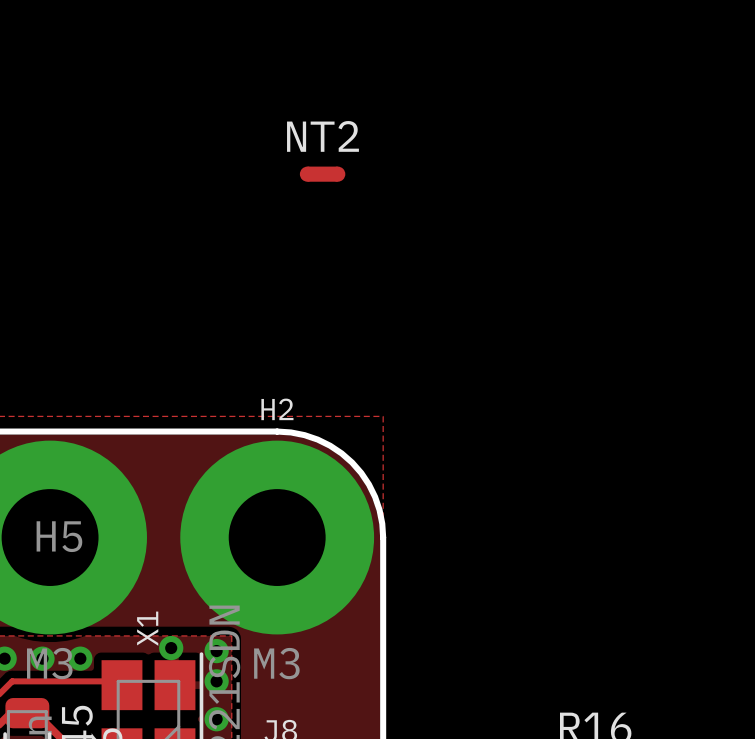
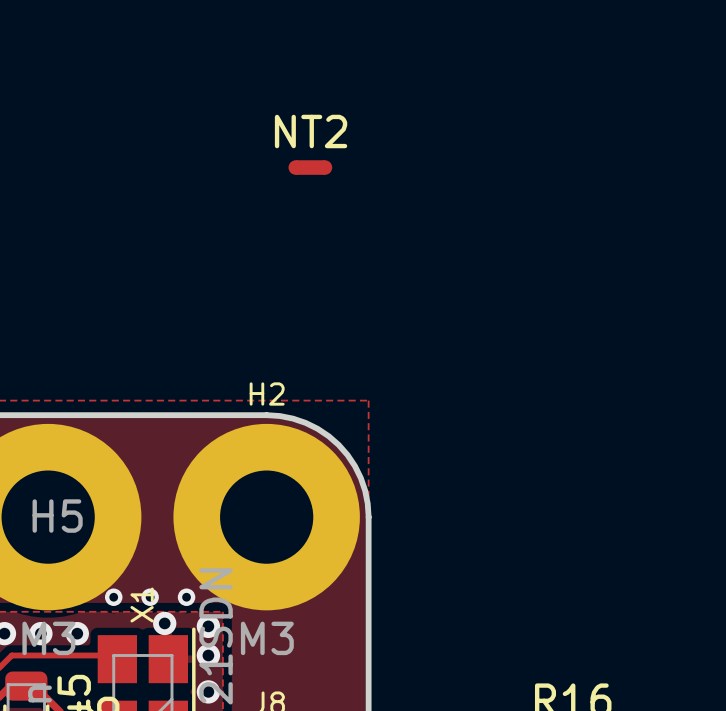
via: none -> (113, 597)
via: none -> (150, 597)
via: none -> (186, 597)

